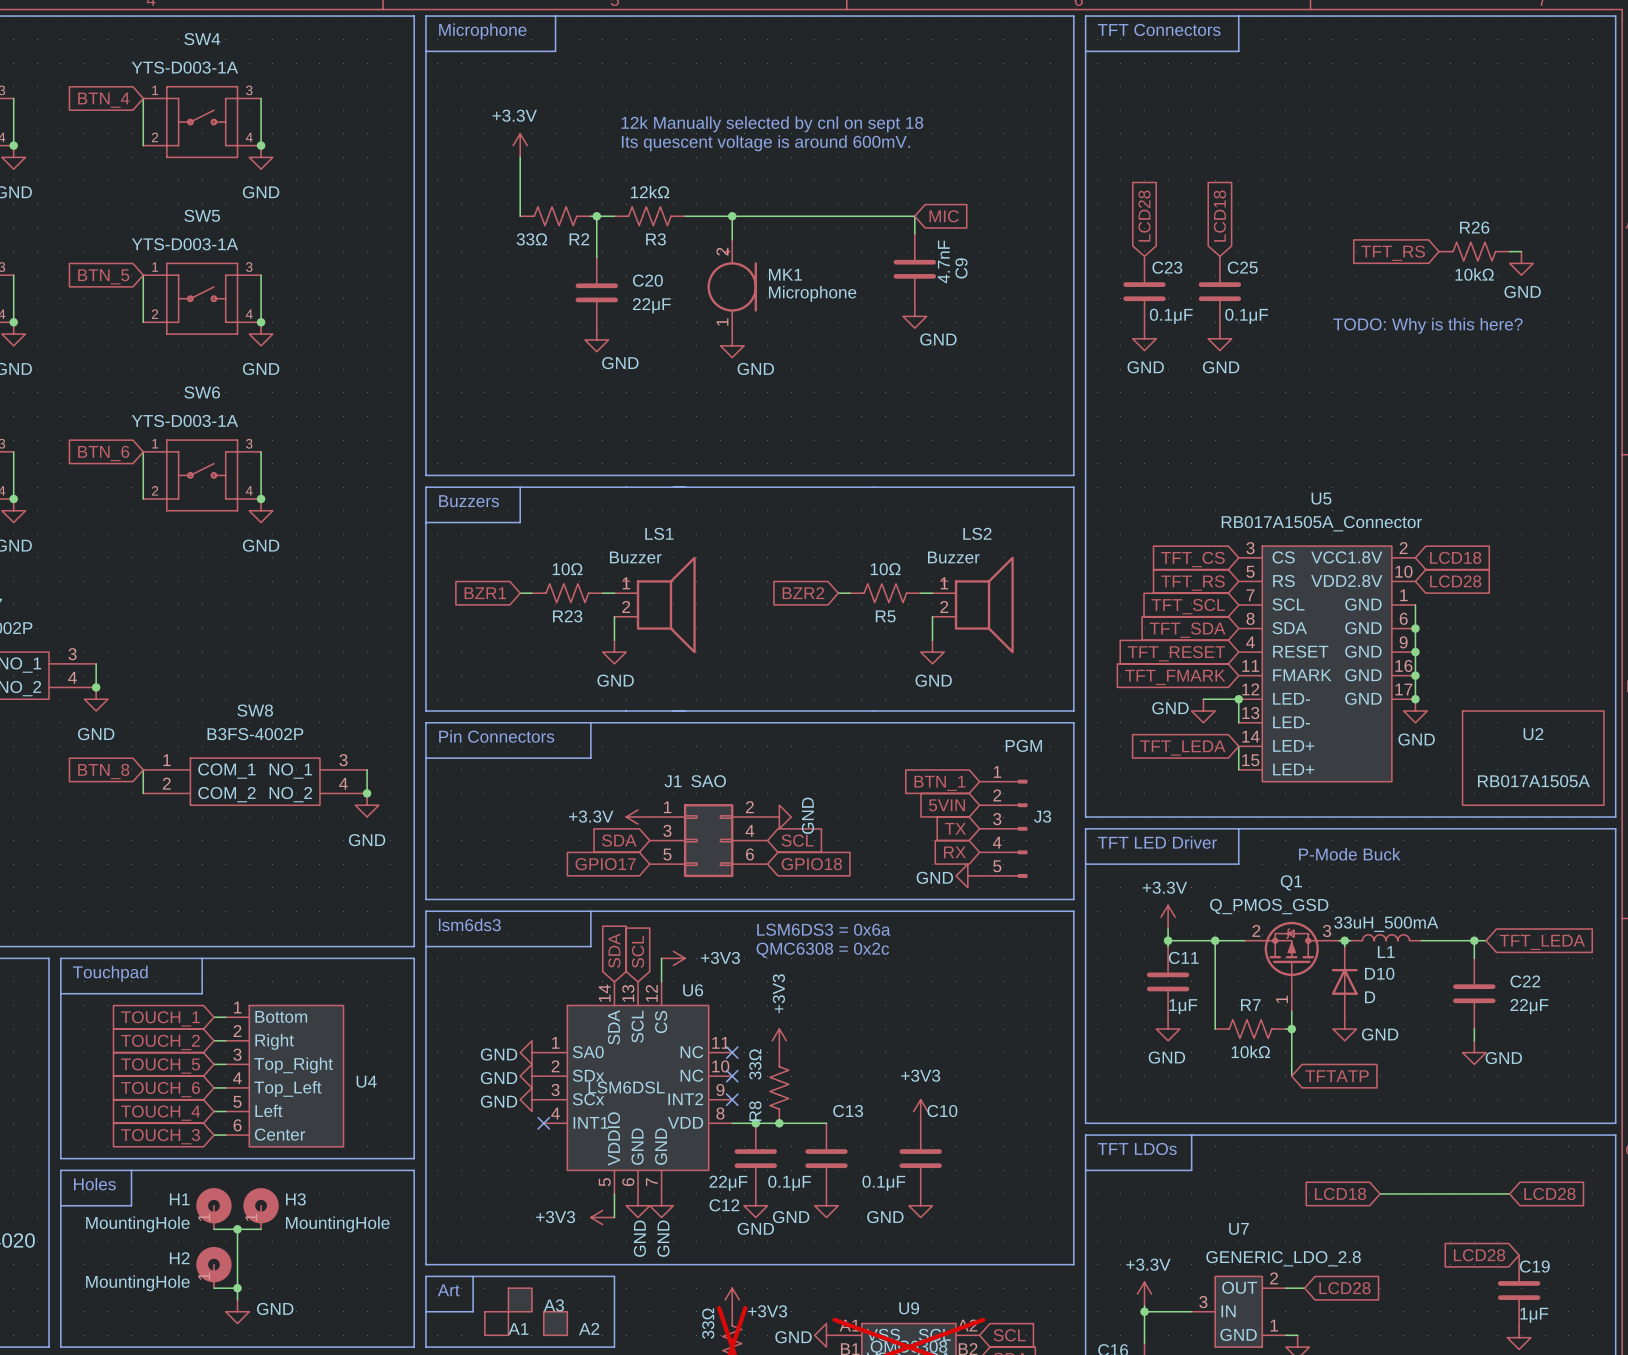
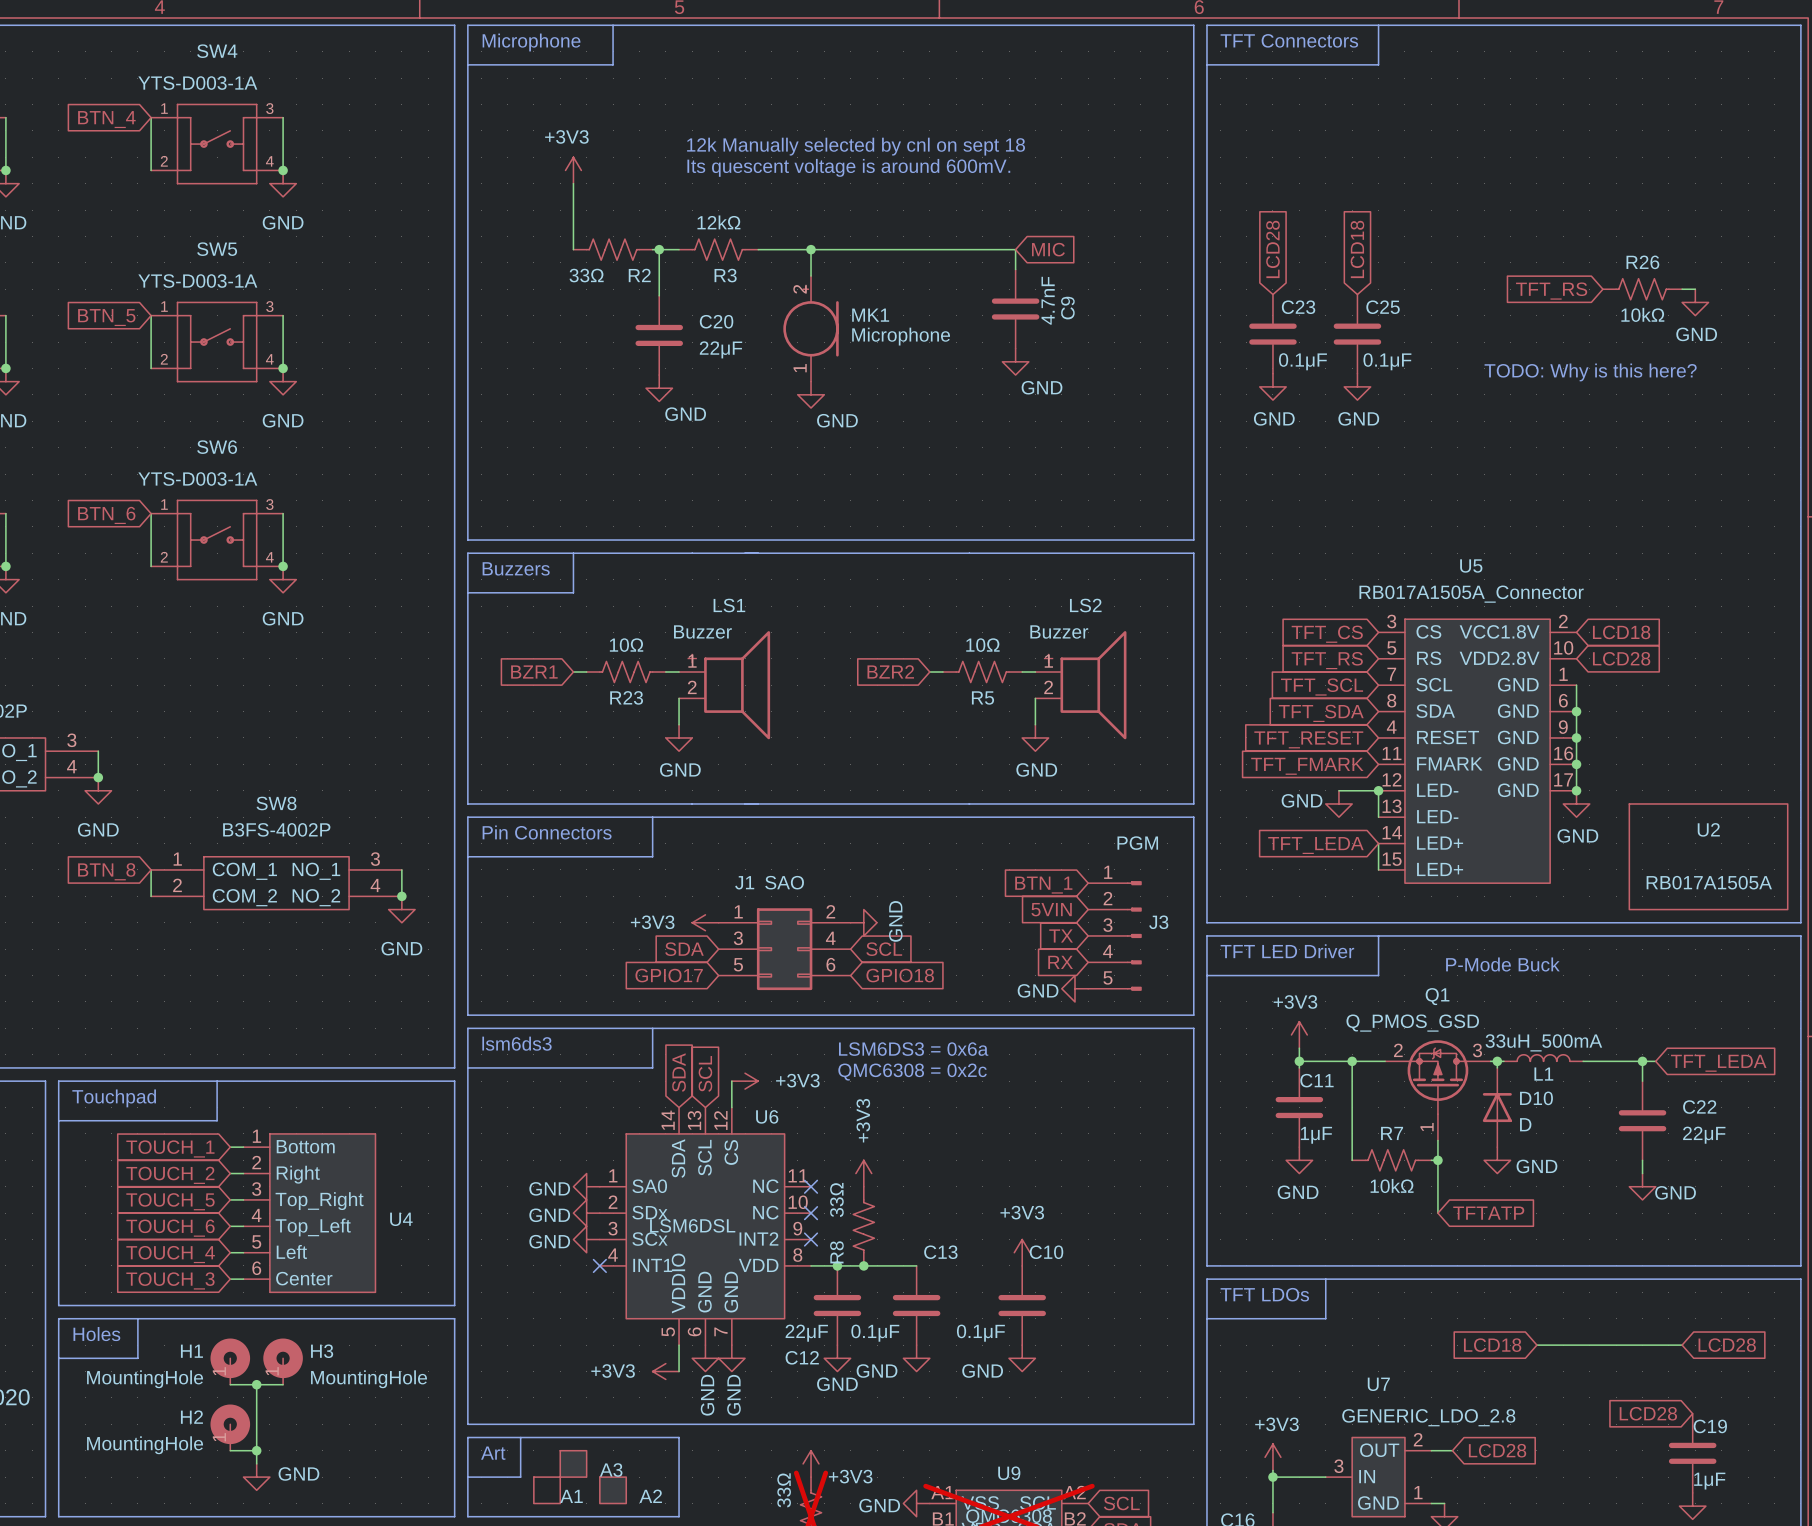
power symbol: +3.3V (520, 145) -> +3V3 (573, 170)
power symbol: +3.3V (638, 817) -> +3V3 (705, 922)
power symbol: +3.3V (1168, 917) -> +3V3 (1299, 1034)
power symbol: +3.3V (1144, 1294) -> +3V3 (1272, 1457)

